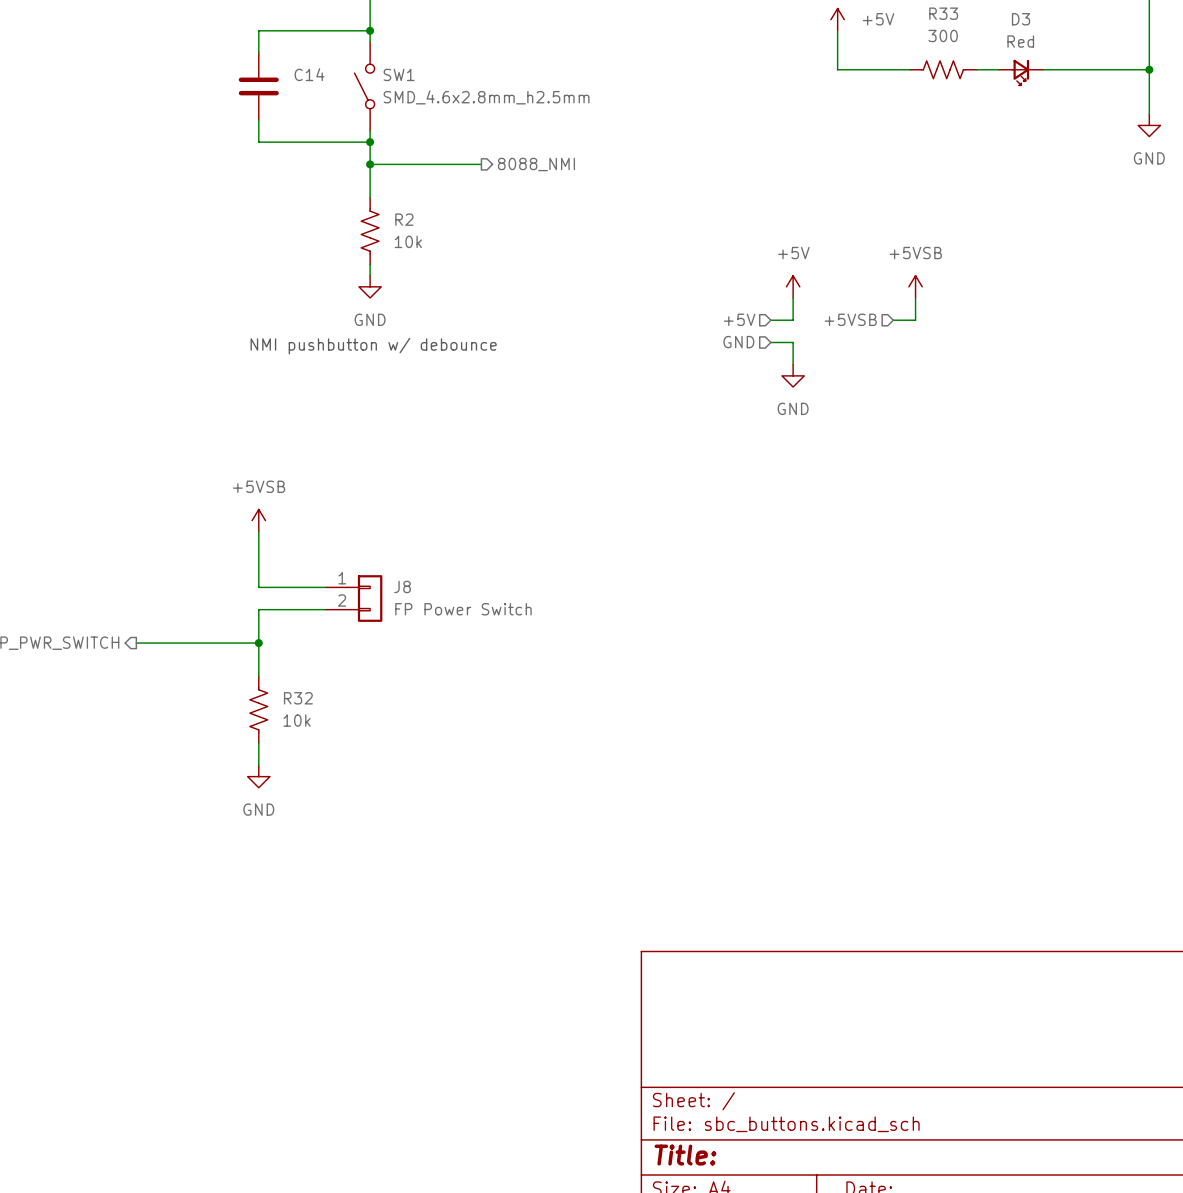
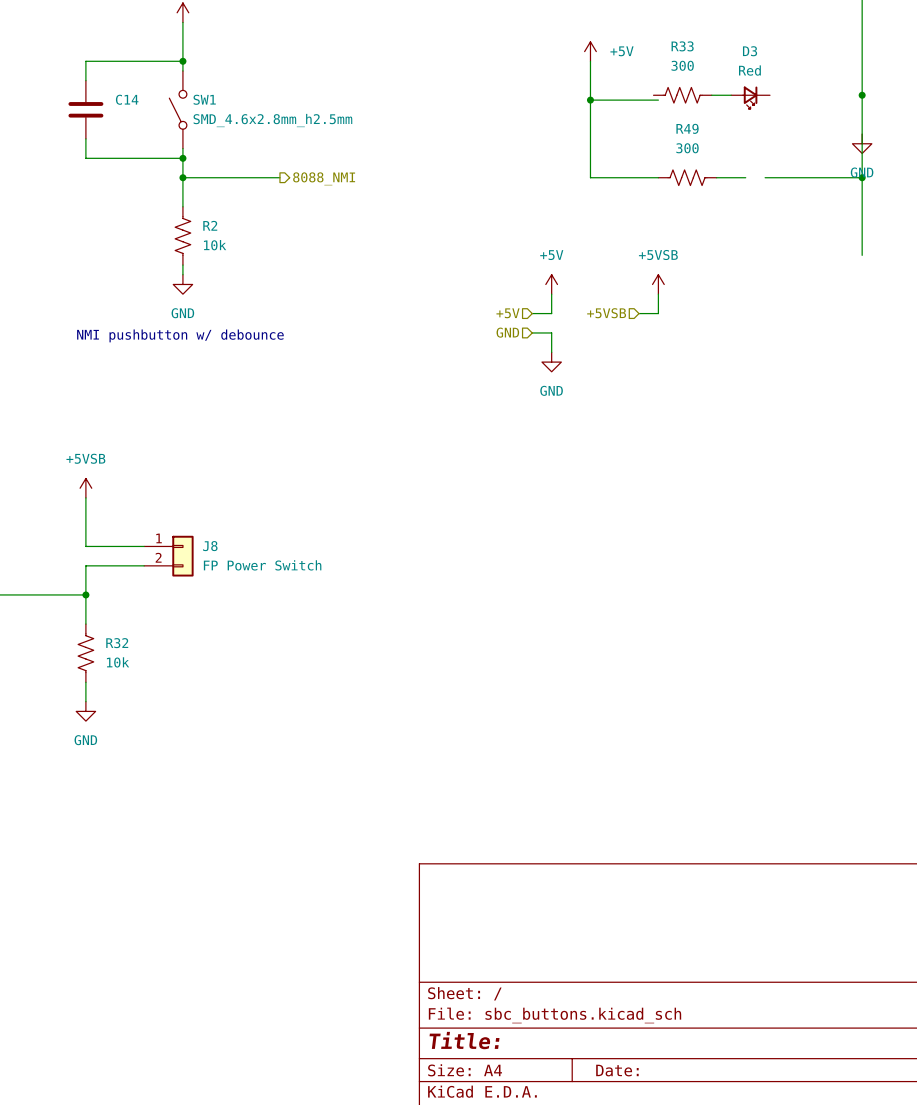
wire: (837, 69) (909, 69) -> (590, 95) (590, 177) (658, 177)
wire: (1043, 69) (1149, 69) -> none
wire: none -> (590, 100) (658, 100)
junction: none -> (590, 100)
wire: none -> (862, 134) (862, 255)
R49: none -> 300 (687, 177)
wire: none -> (716, 177) (745, 177)
wire: none -> (765, 177) (862, 177)
junction: none -> (862, 177)

